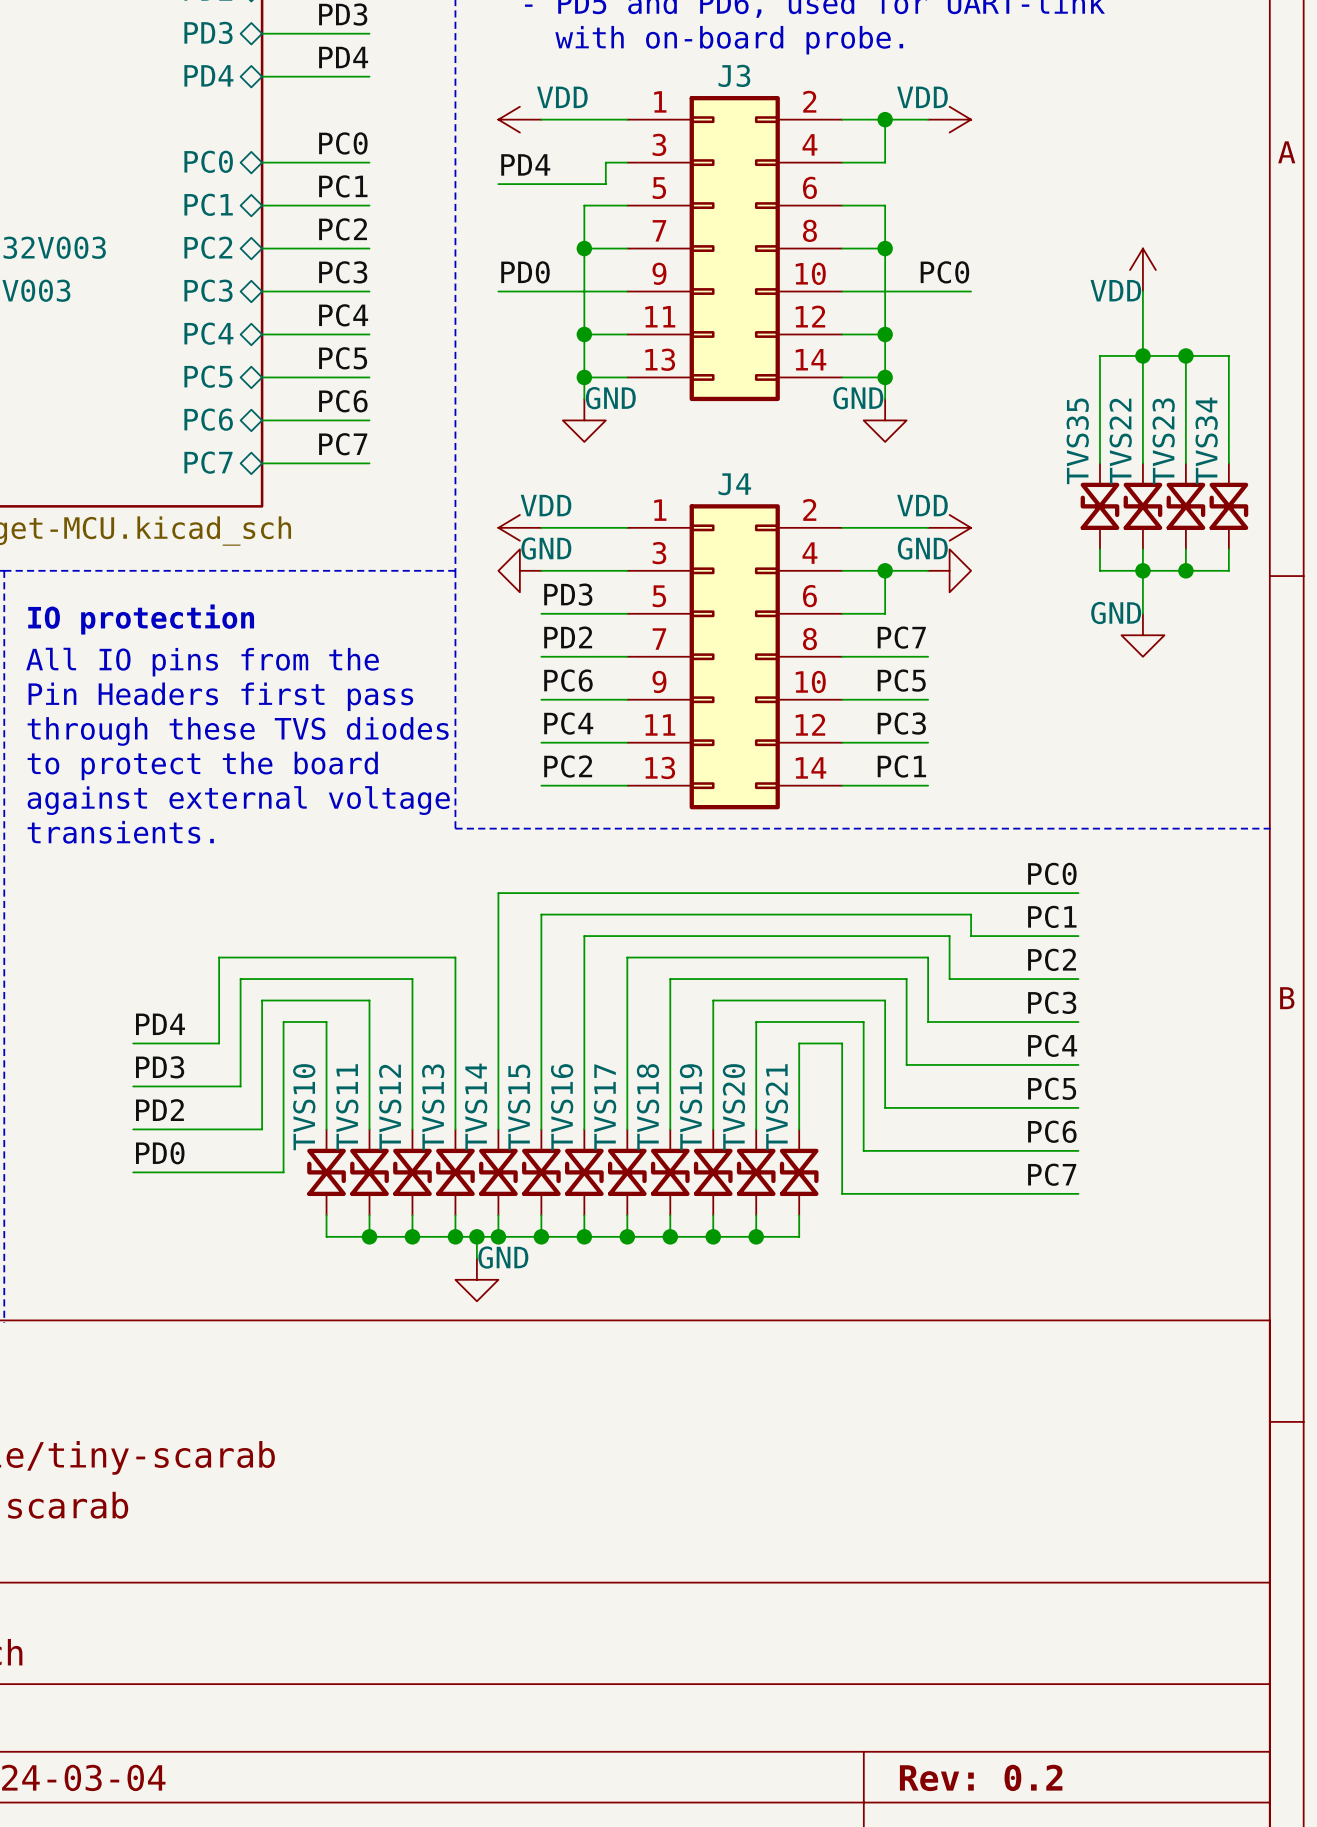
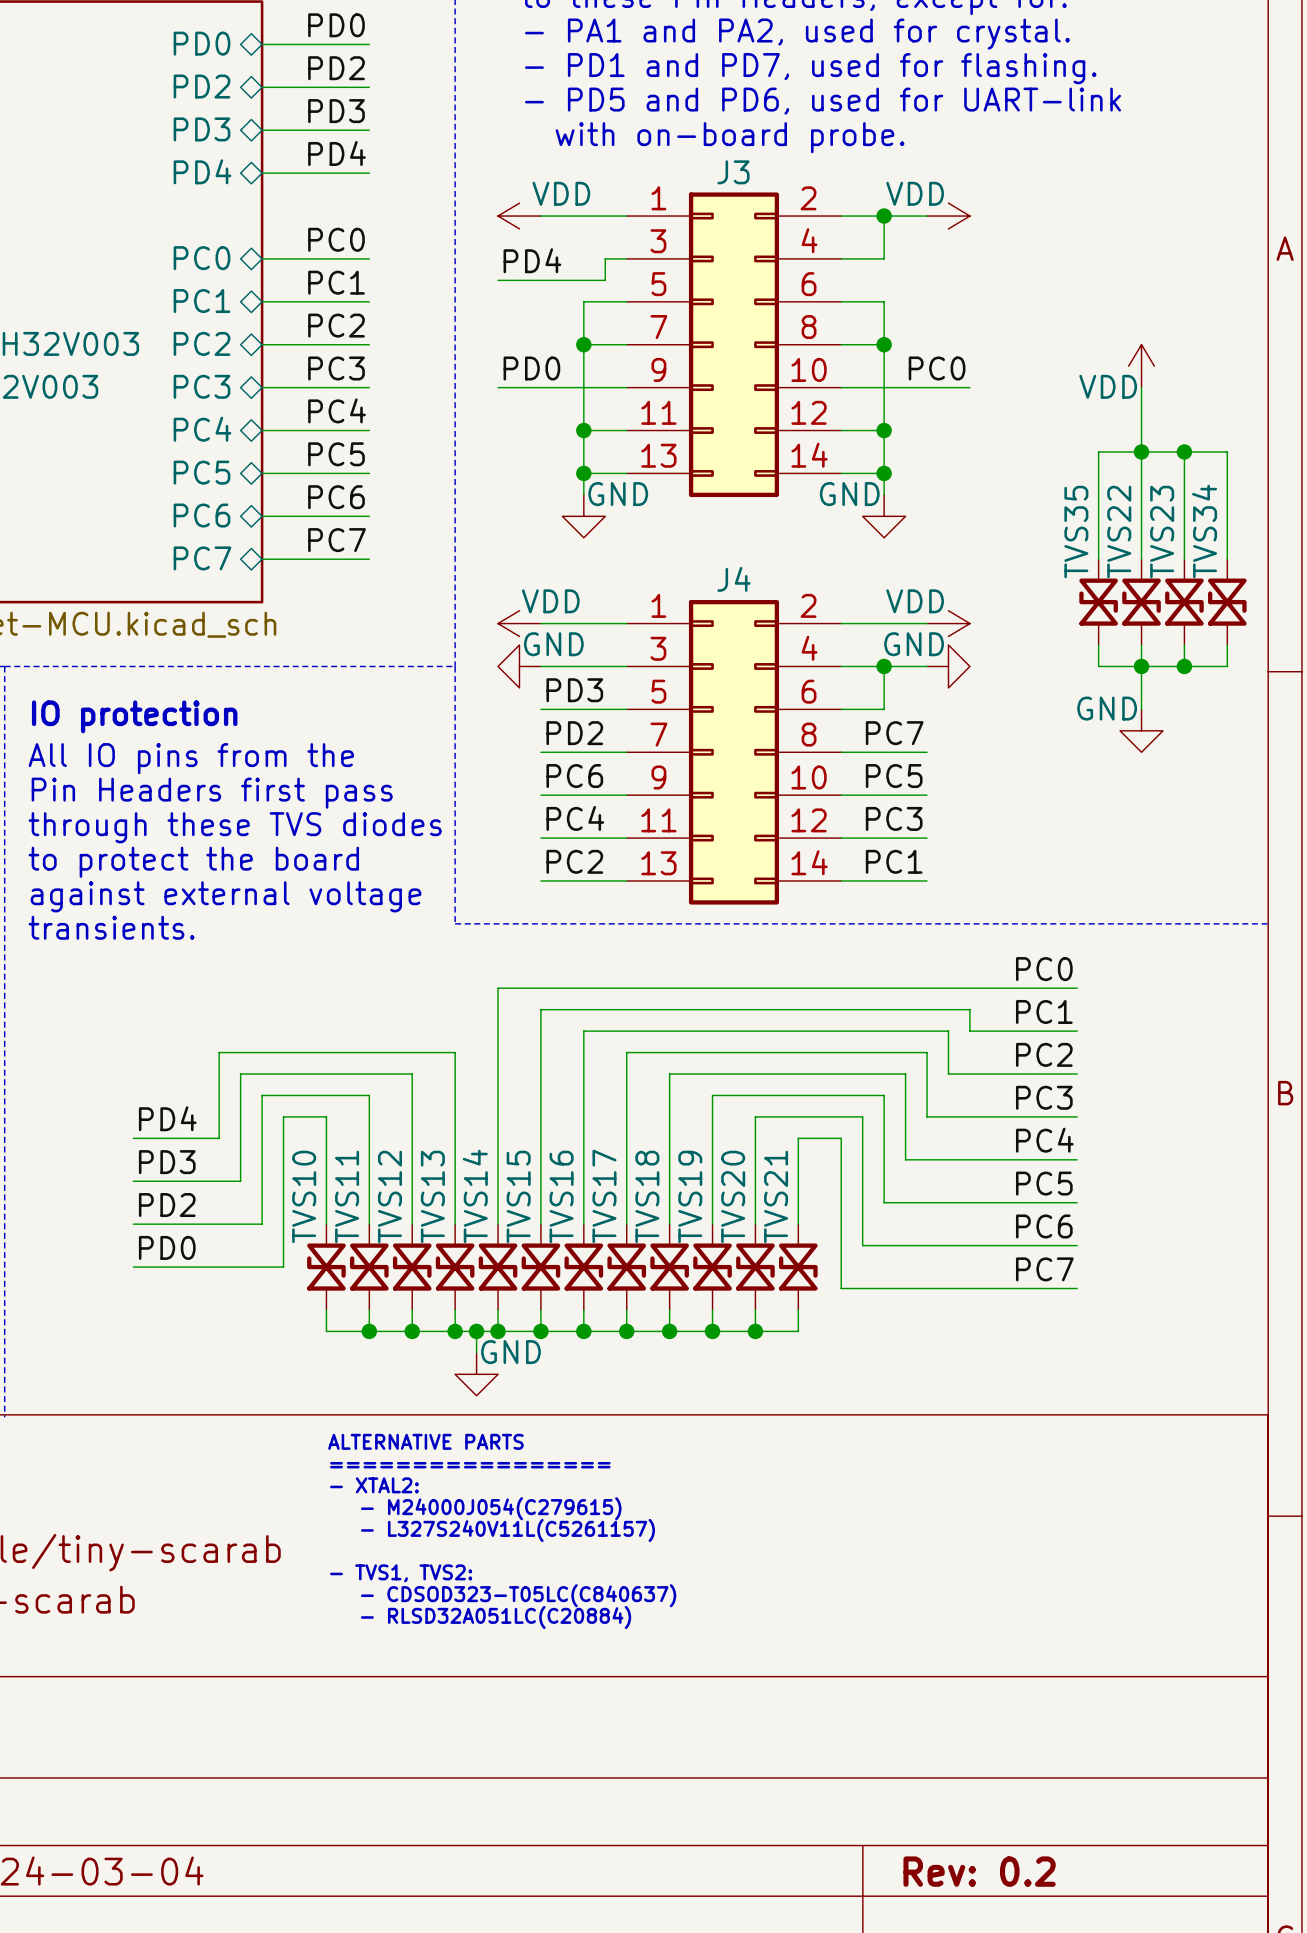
text: none -> ALTERNATIVE PARTS (425, 1441)
text: none -> ================= (470, 1465)
text: none -> - XTAL2: (374, 1485)
text: none -> - M24000J054(C279615) (491, 1508)
text: none -> - L327S240V11L(C5261157) (507, 1530)
text: none -> - TVS1, TVS2: (401, 1573)
text: none -> - CDSOD323-T05LC(C840637) (518, 1595)
text: none -> - RLSD32A051LC(C20884) (496, 1617)

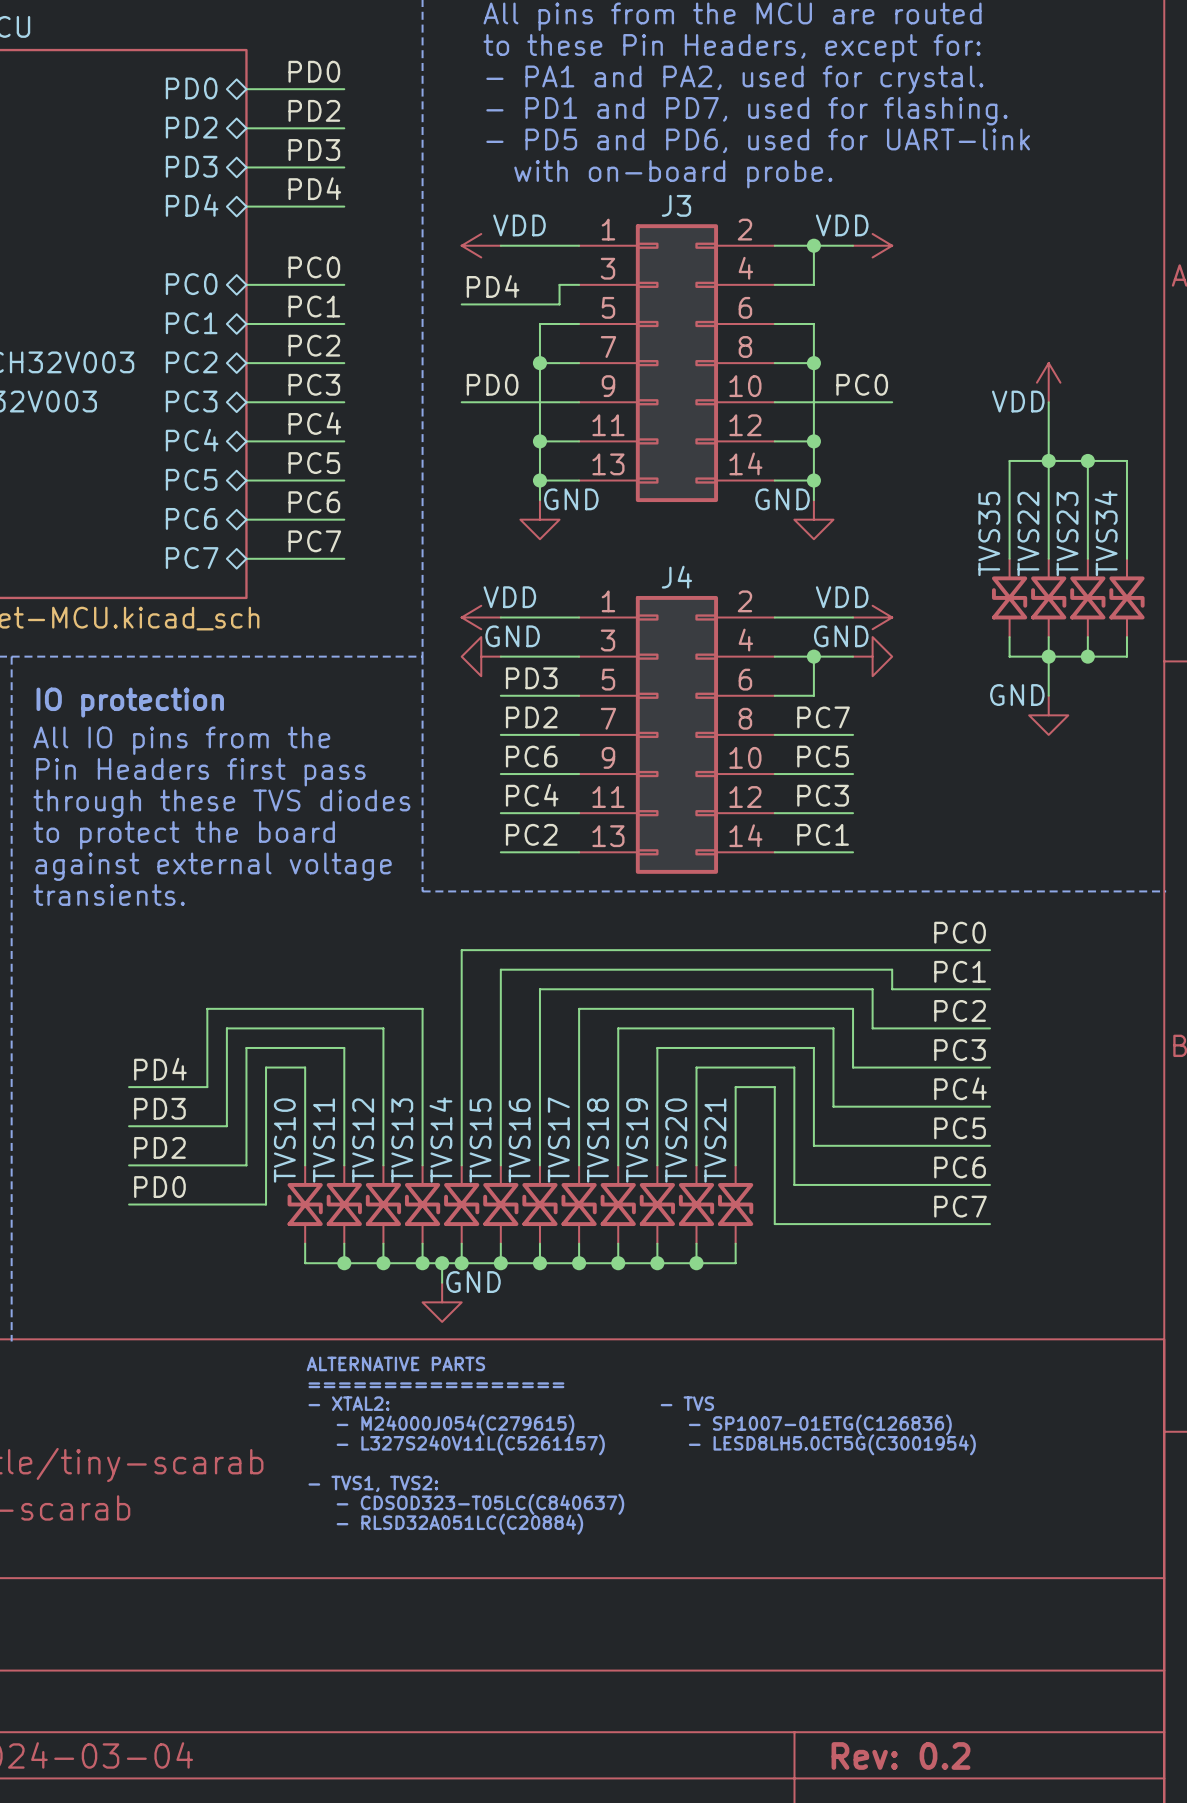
text: none -> - TVS (687, 1403)
text: none -> - SP1007-01ETG(C126836) (820, 1424)
text: none -> - LESD8LH5.0CT5G(C3001954) (832, 1444)

